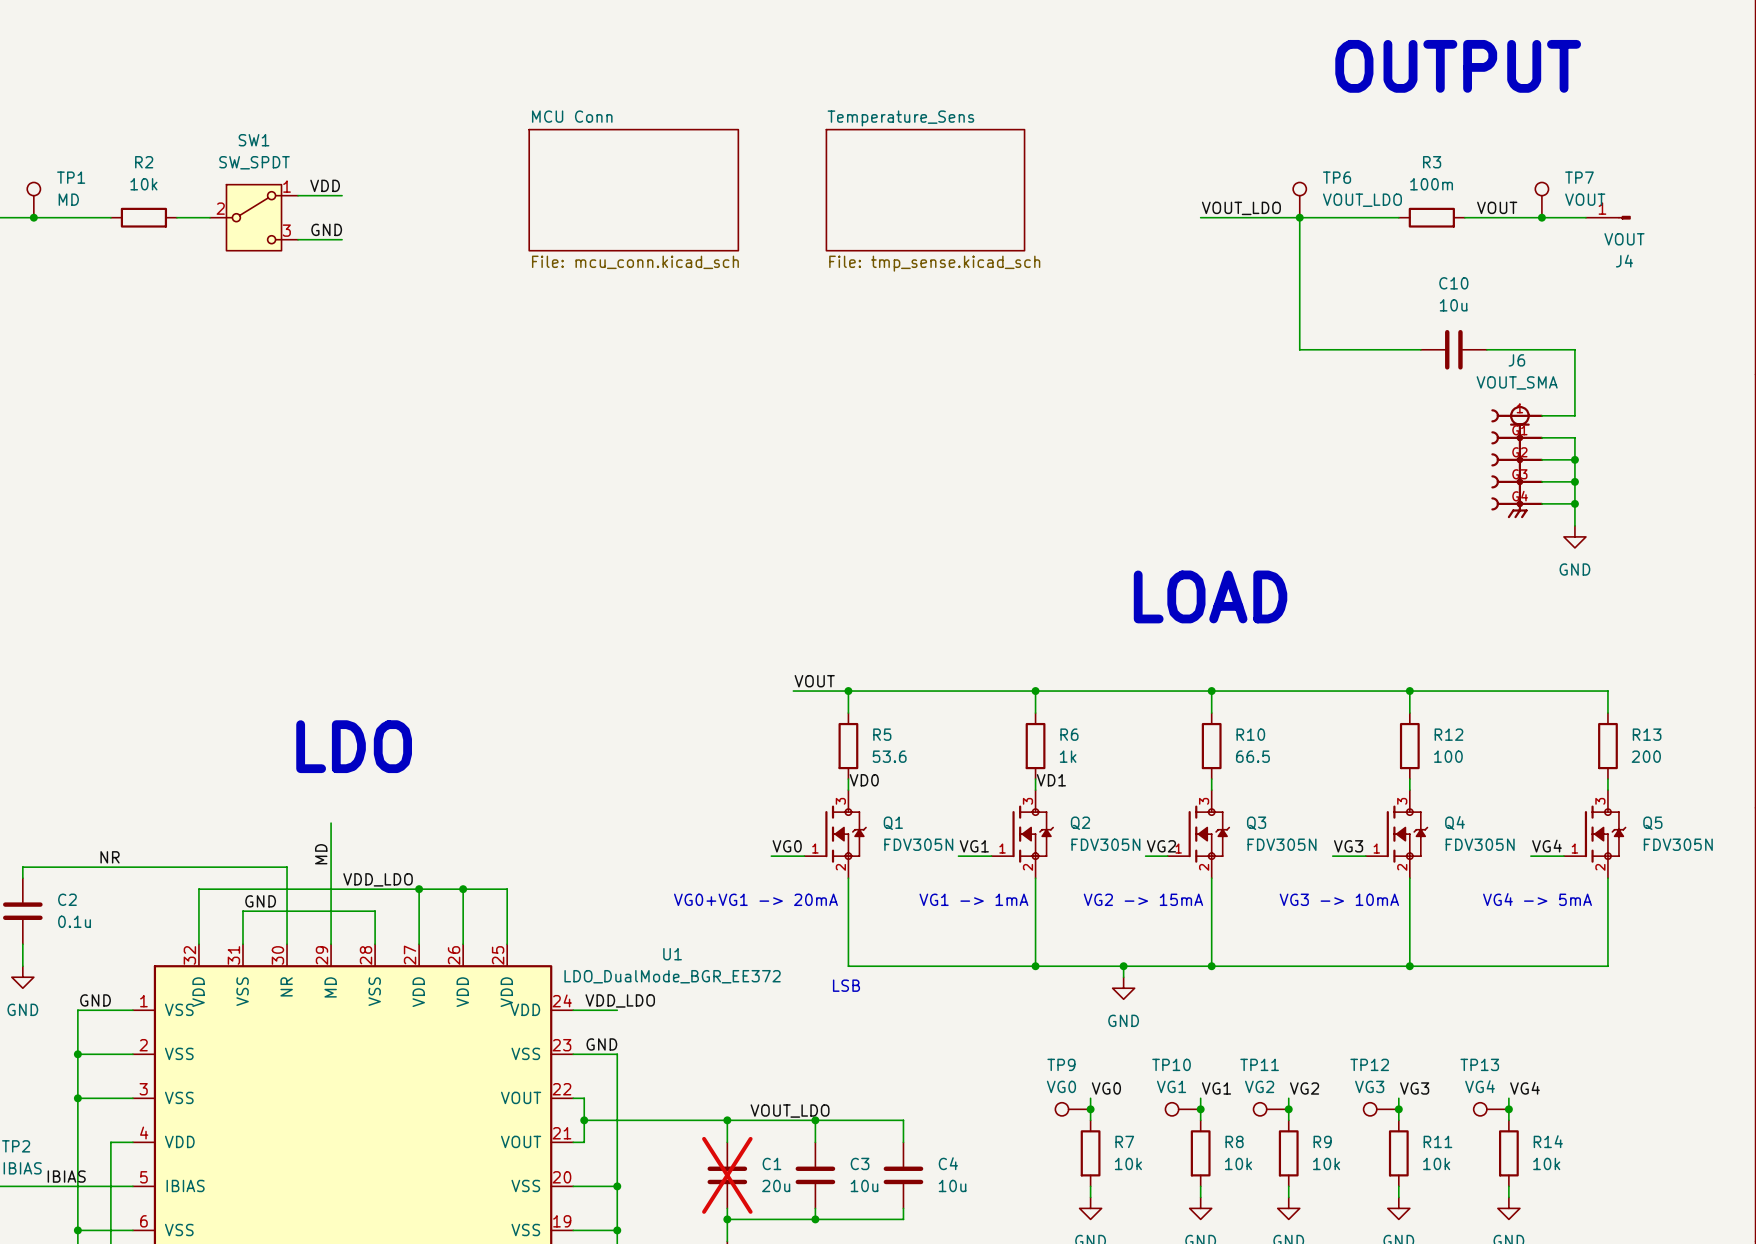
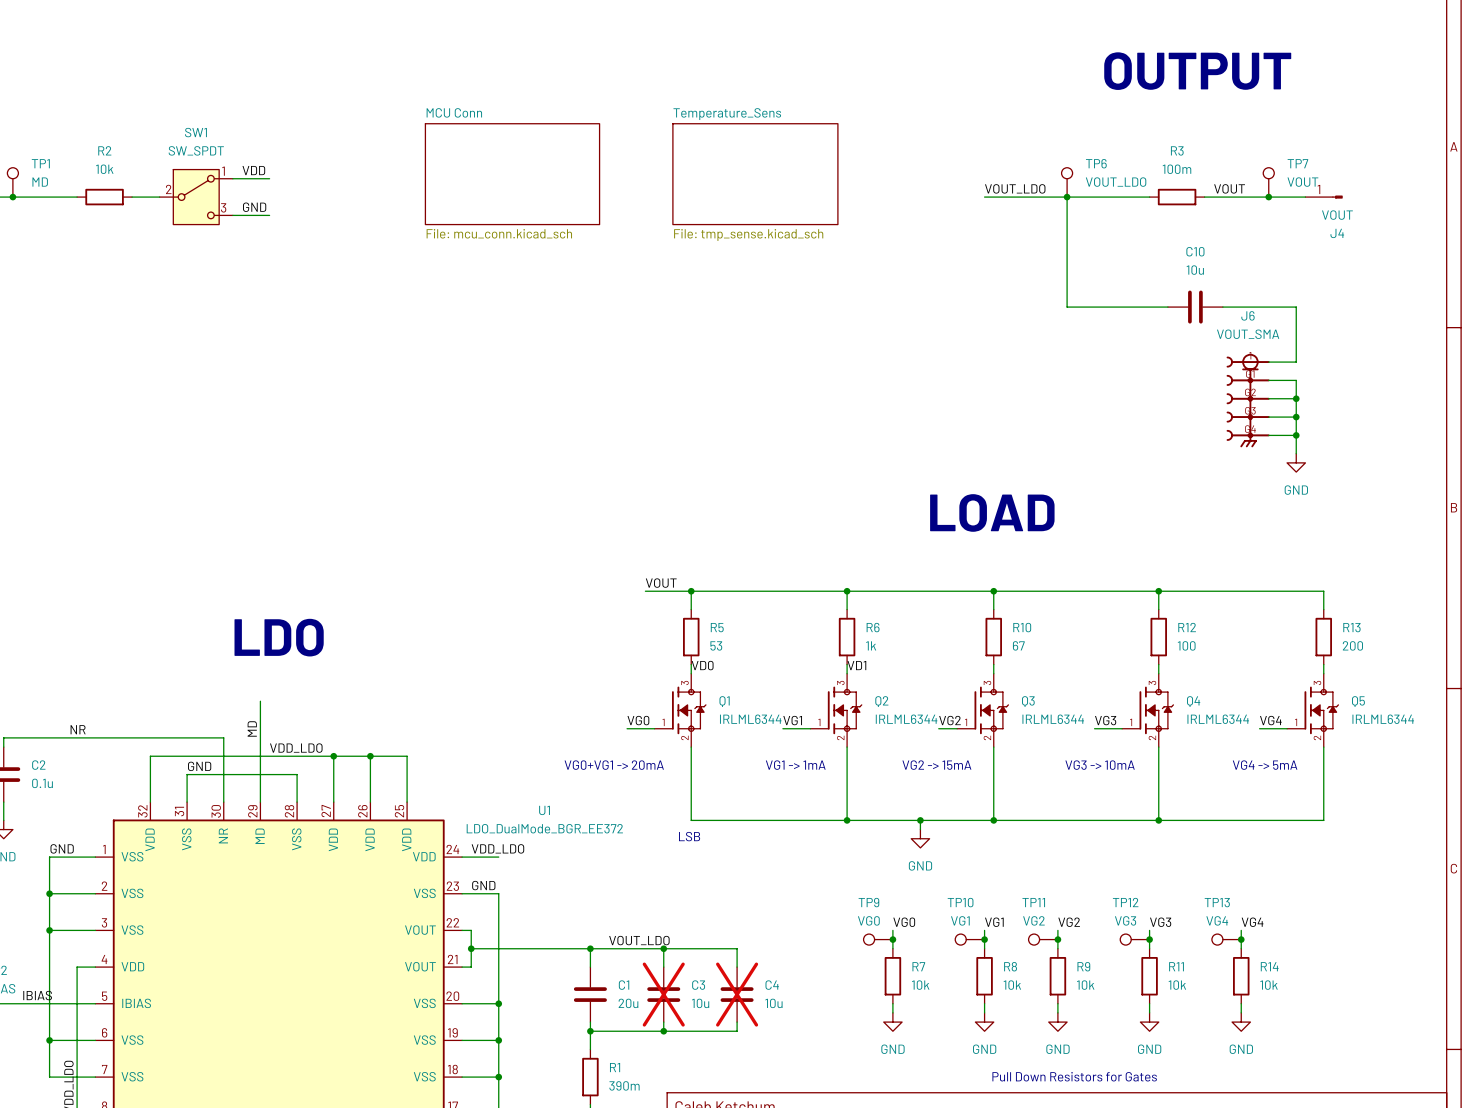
R5 value: 53.6 (889, 756) -> 53 (716, 645)
R10 value: 66.5 (1252, 756) -> 67 (1018, 645)
Q1 value: FDV305N (918, 844) -> IRLML6344 (750, 719)
Q2 value: FDV305N (1105, 844) -> IRLML6344 (906, 719)
Q3 value: FDV305N (1282, 844) -> IRLML6344 (1053, 719)
Q4 value: FDV305N (1480, 844) -> IRLML6344 (1218, 719)
Q5 value: FDV305N (1678, 844) -> IRLML6344 (1383, 719)
C1 do-not-place cross: (727, 1175) -> none
C3 do-not-place cross: none -> (663, 994)
C4 do-not-place cross: none -> (737, 994)

